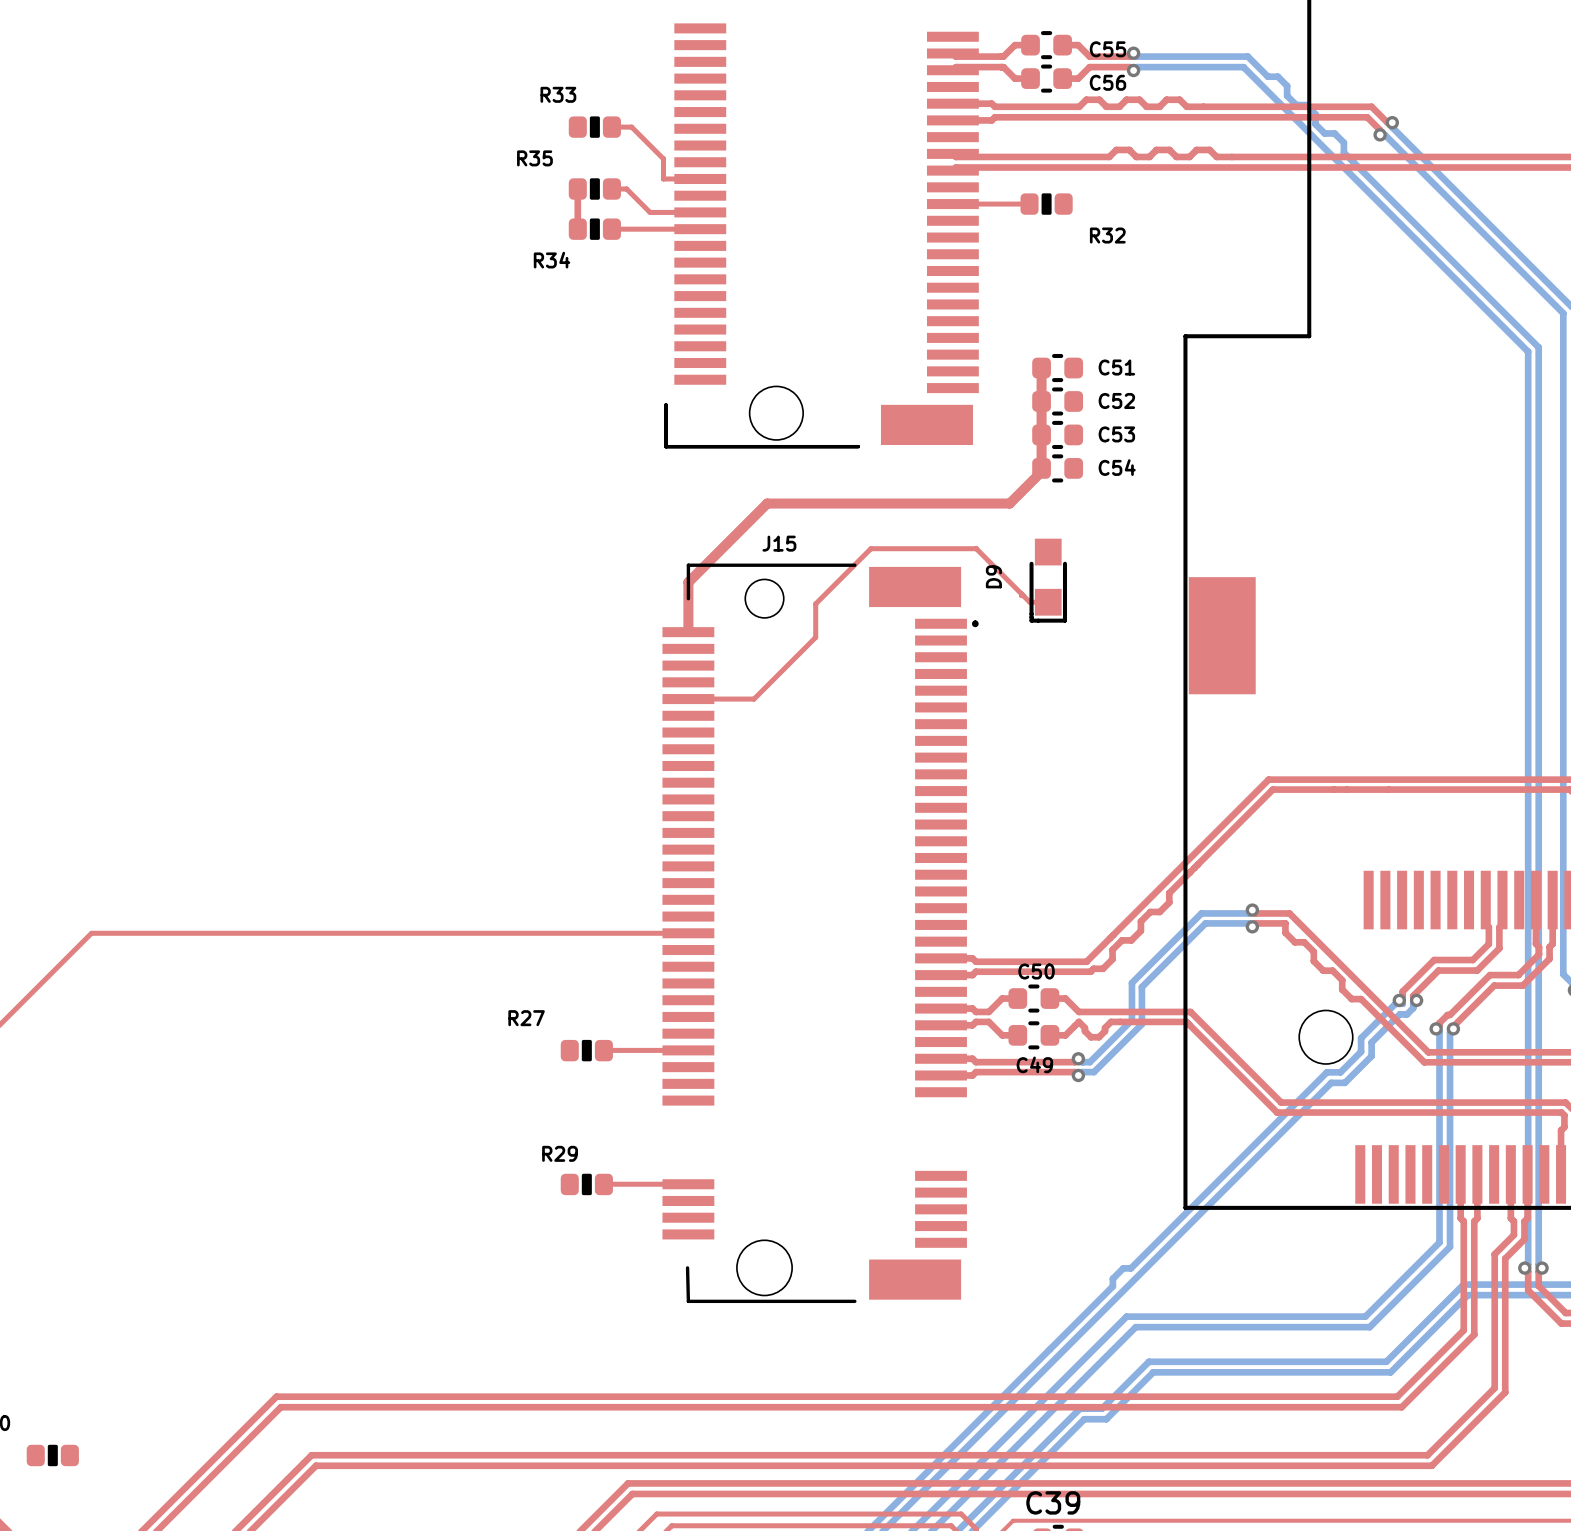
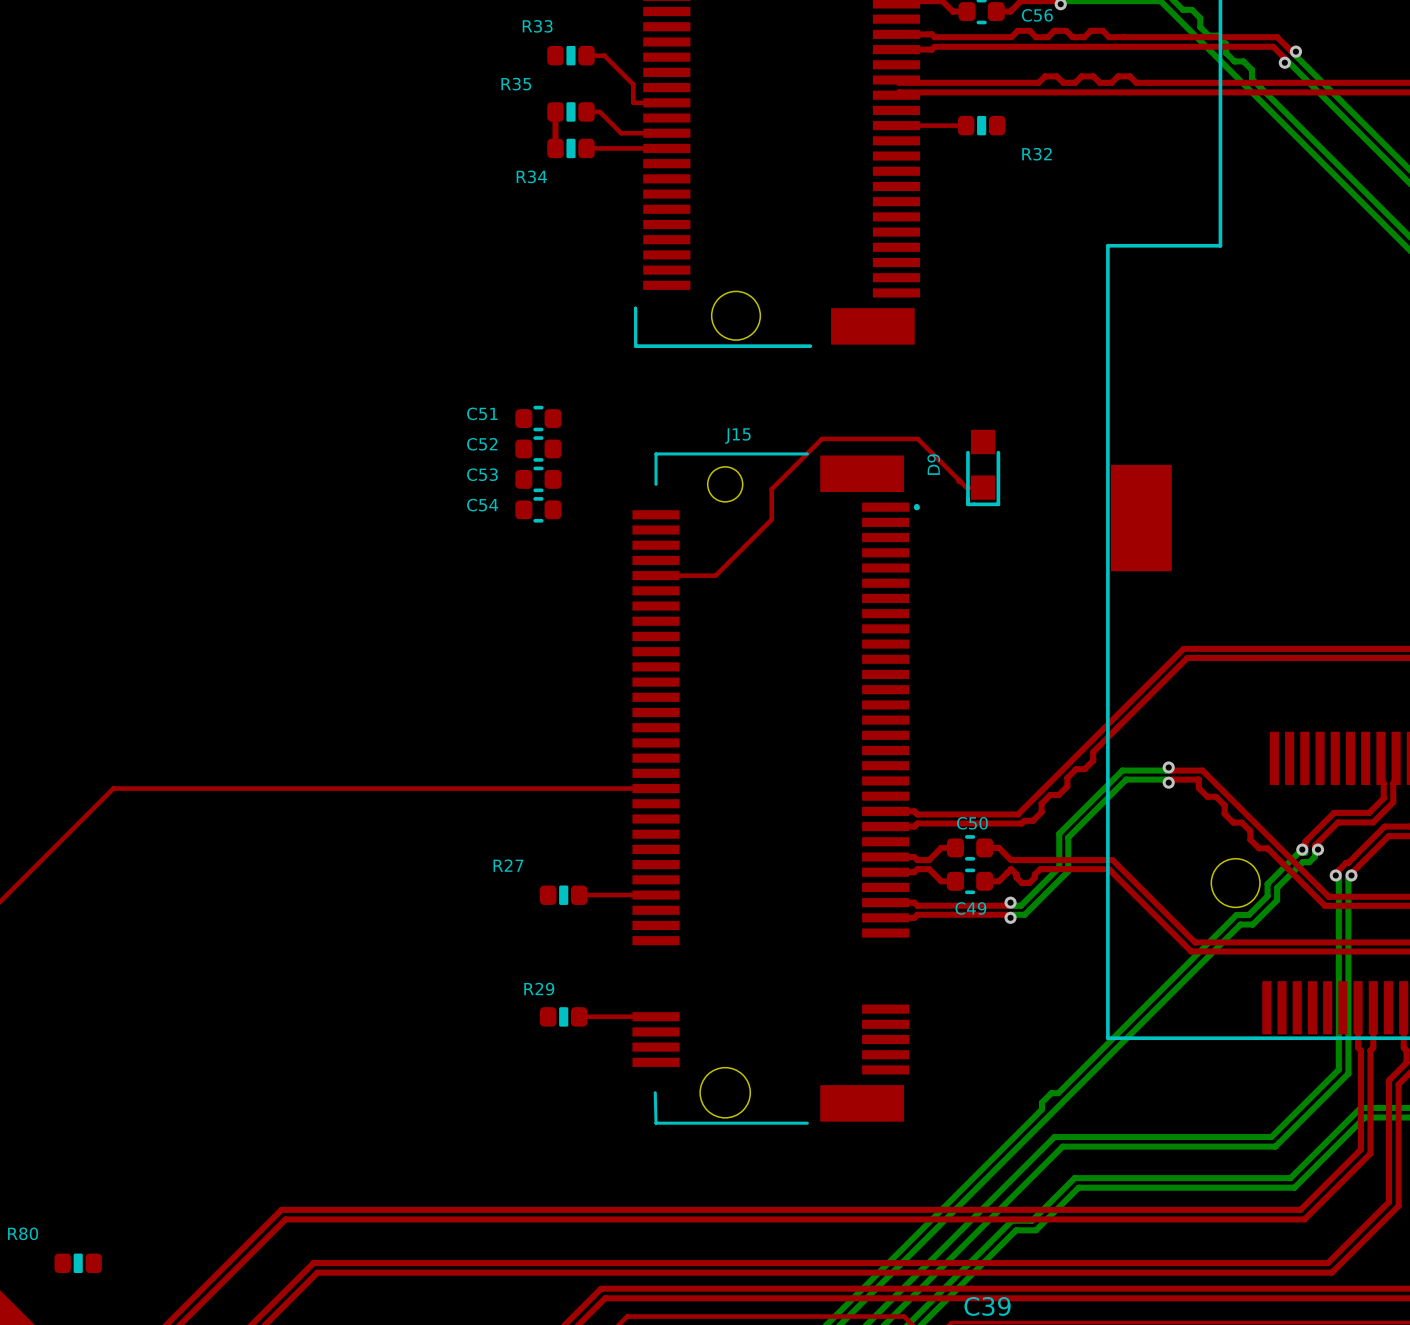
C51 name position: C51 (1116, 367) -> C51 (482, 413)
top track: (1041, 368) (1041, 471) (1009, 503) (767, 503) (688, 582) (688, 632) -> none
C51 position: (1057, 368) -> (538, 418)
C52 name position: C52 (1116, 400) -> C52 (482, 444)
C52 position: (1057, 401) -> (538, 448)
C53 position: (1057, 434) -> (538, 479)
C53 name position: C53 (1116, 434) -> C53 (482, 474)
C54 name position: C54 (1117, 467) -> C54 (482, 505)
C54 position: (1057, 468) -> (538, 509)

